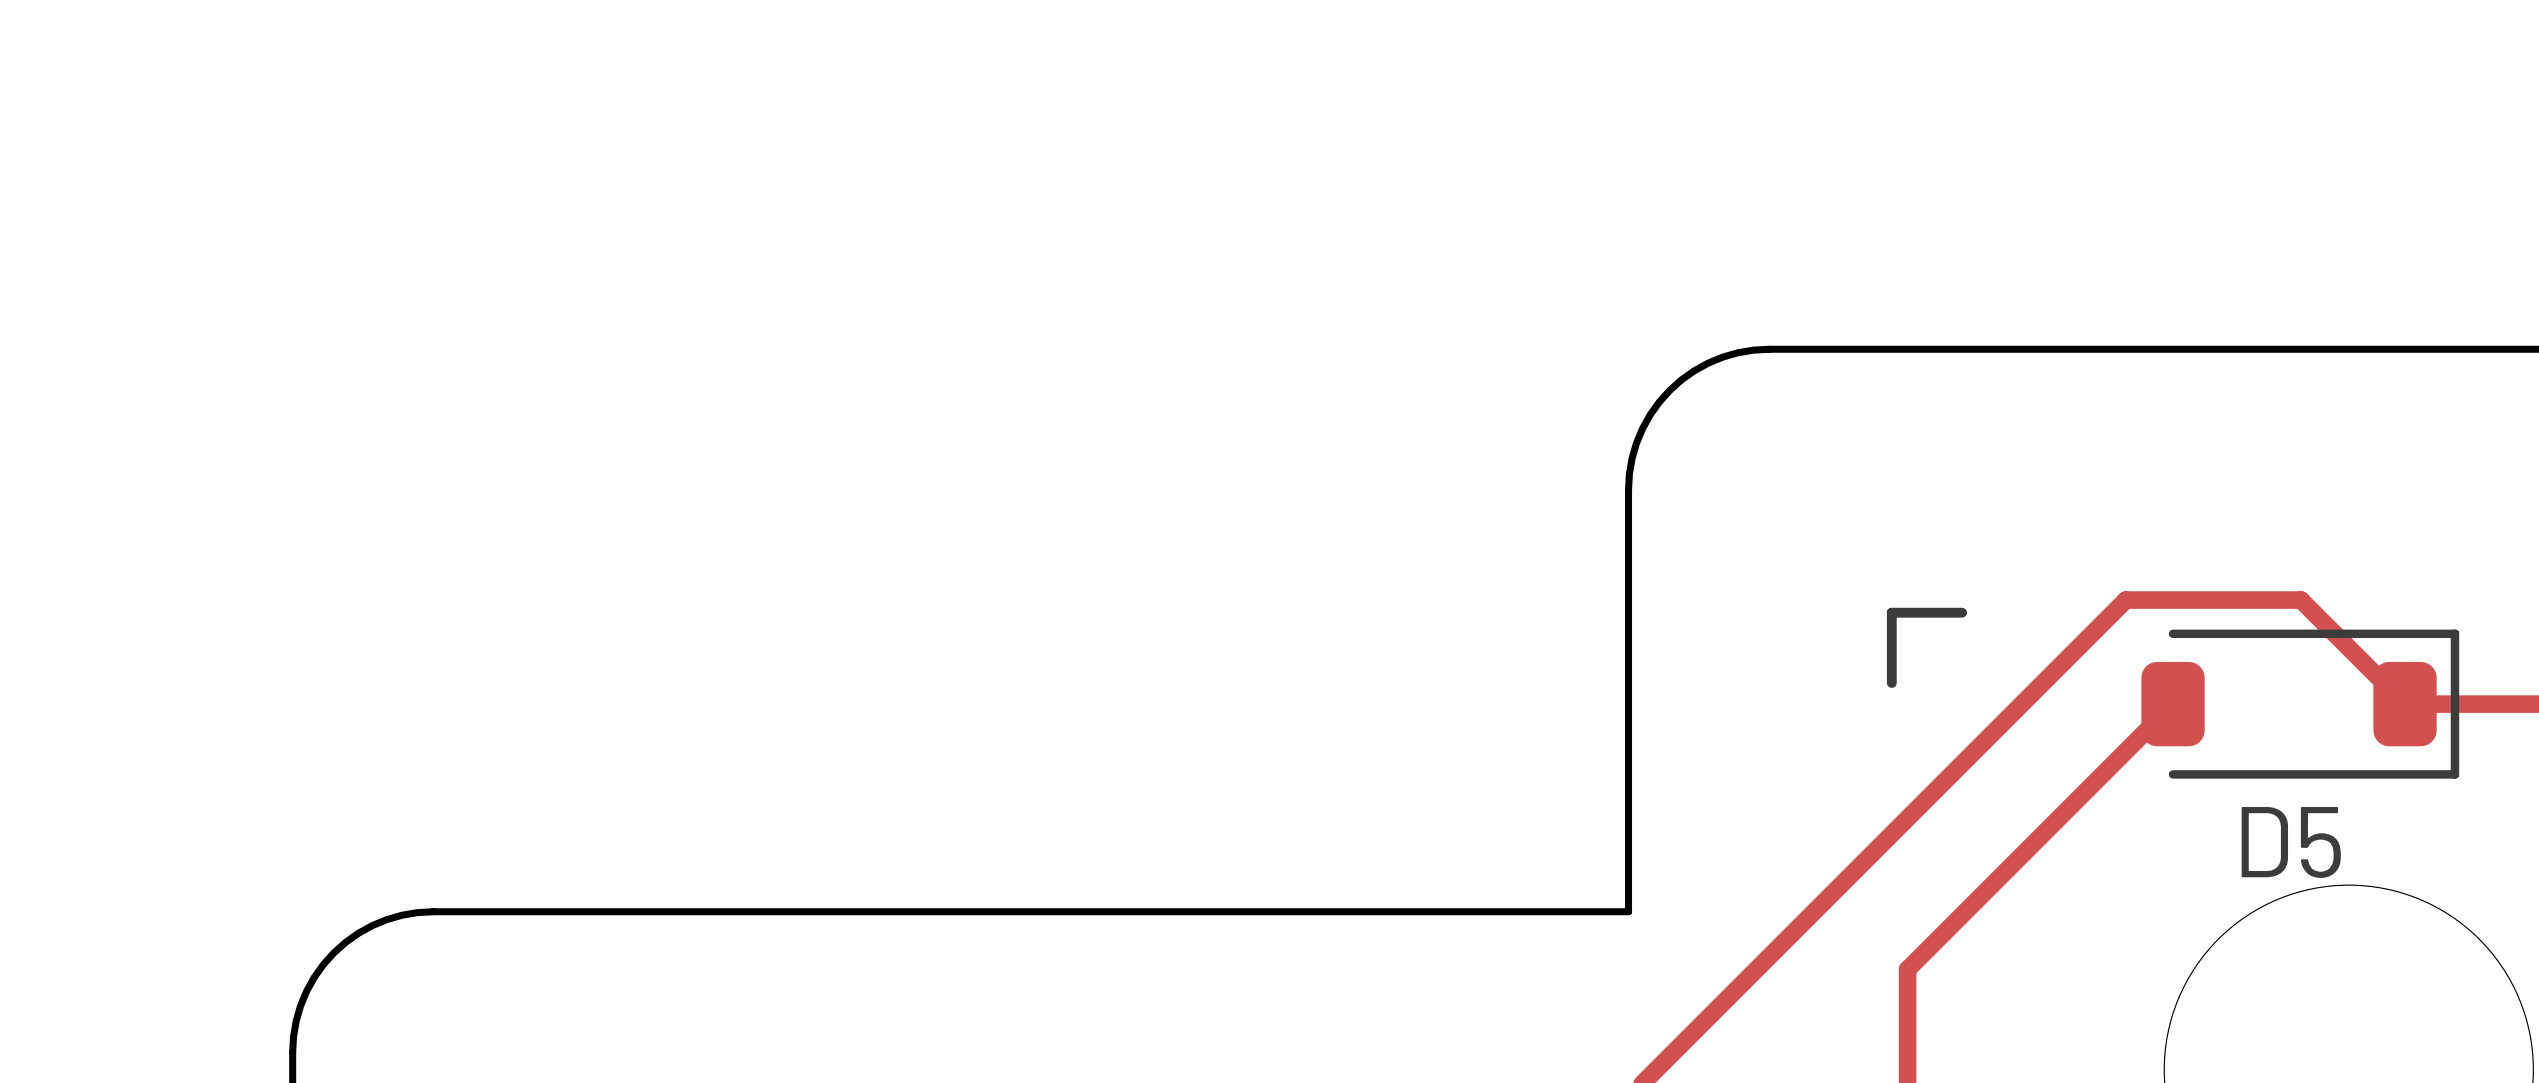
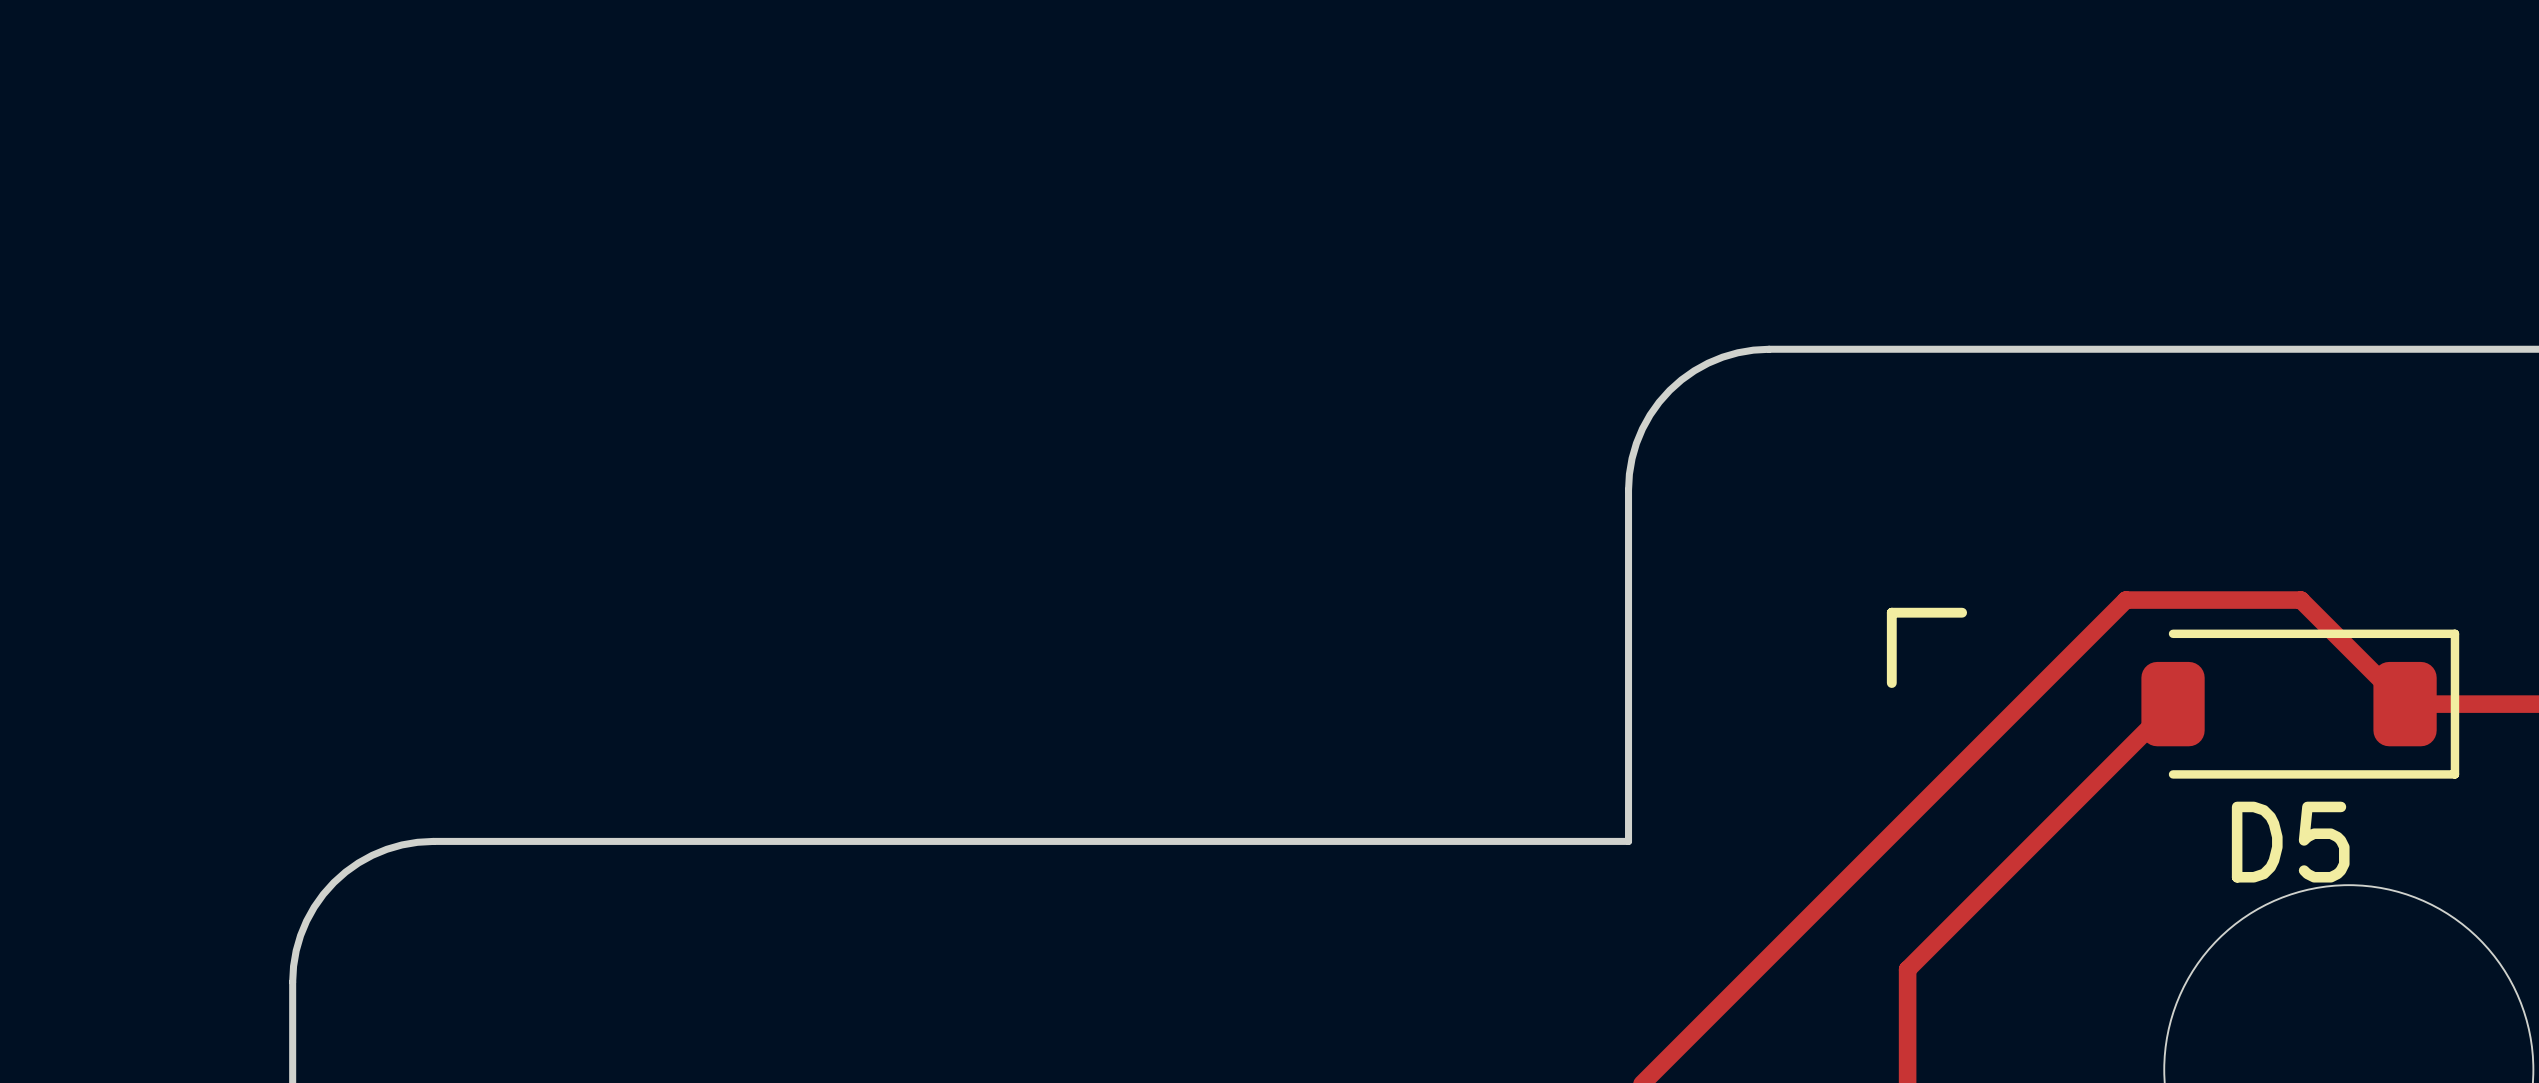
board edge: (1628, 841) (1628, 911) (417, 912) (401, 915) (372, 925) (345, 942) (323, 964) (314, 977) (300, 1005) (296, 1021) (292, 1052) -> (1628, 841) (417, 842) (386, 849) (358, 862) (333, 882) (314, 907) (300, 935) (293, 966) (292, 1052)

